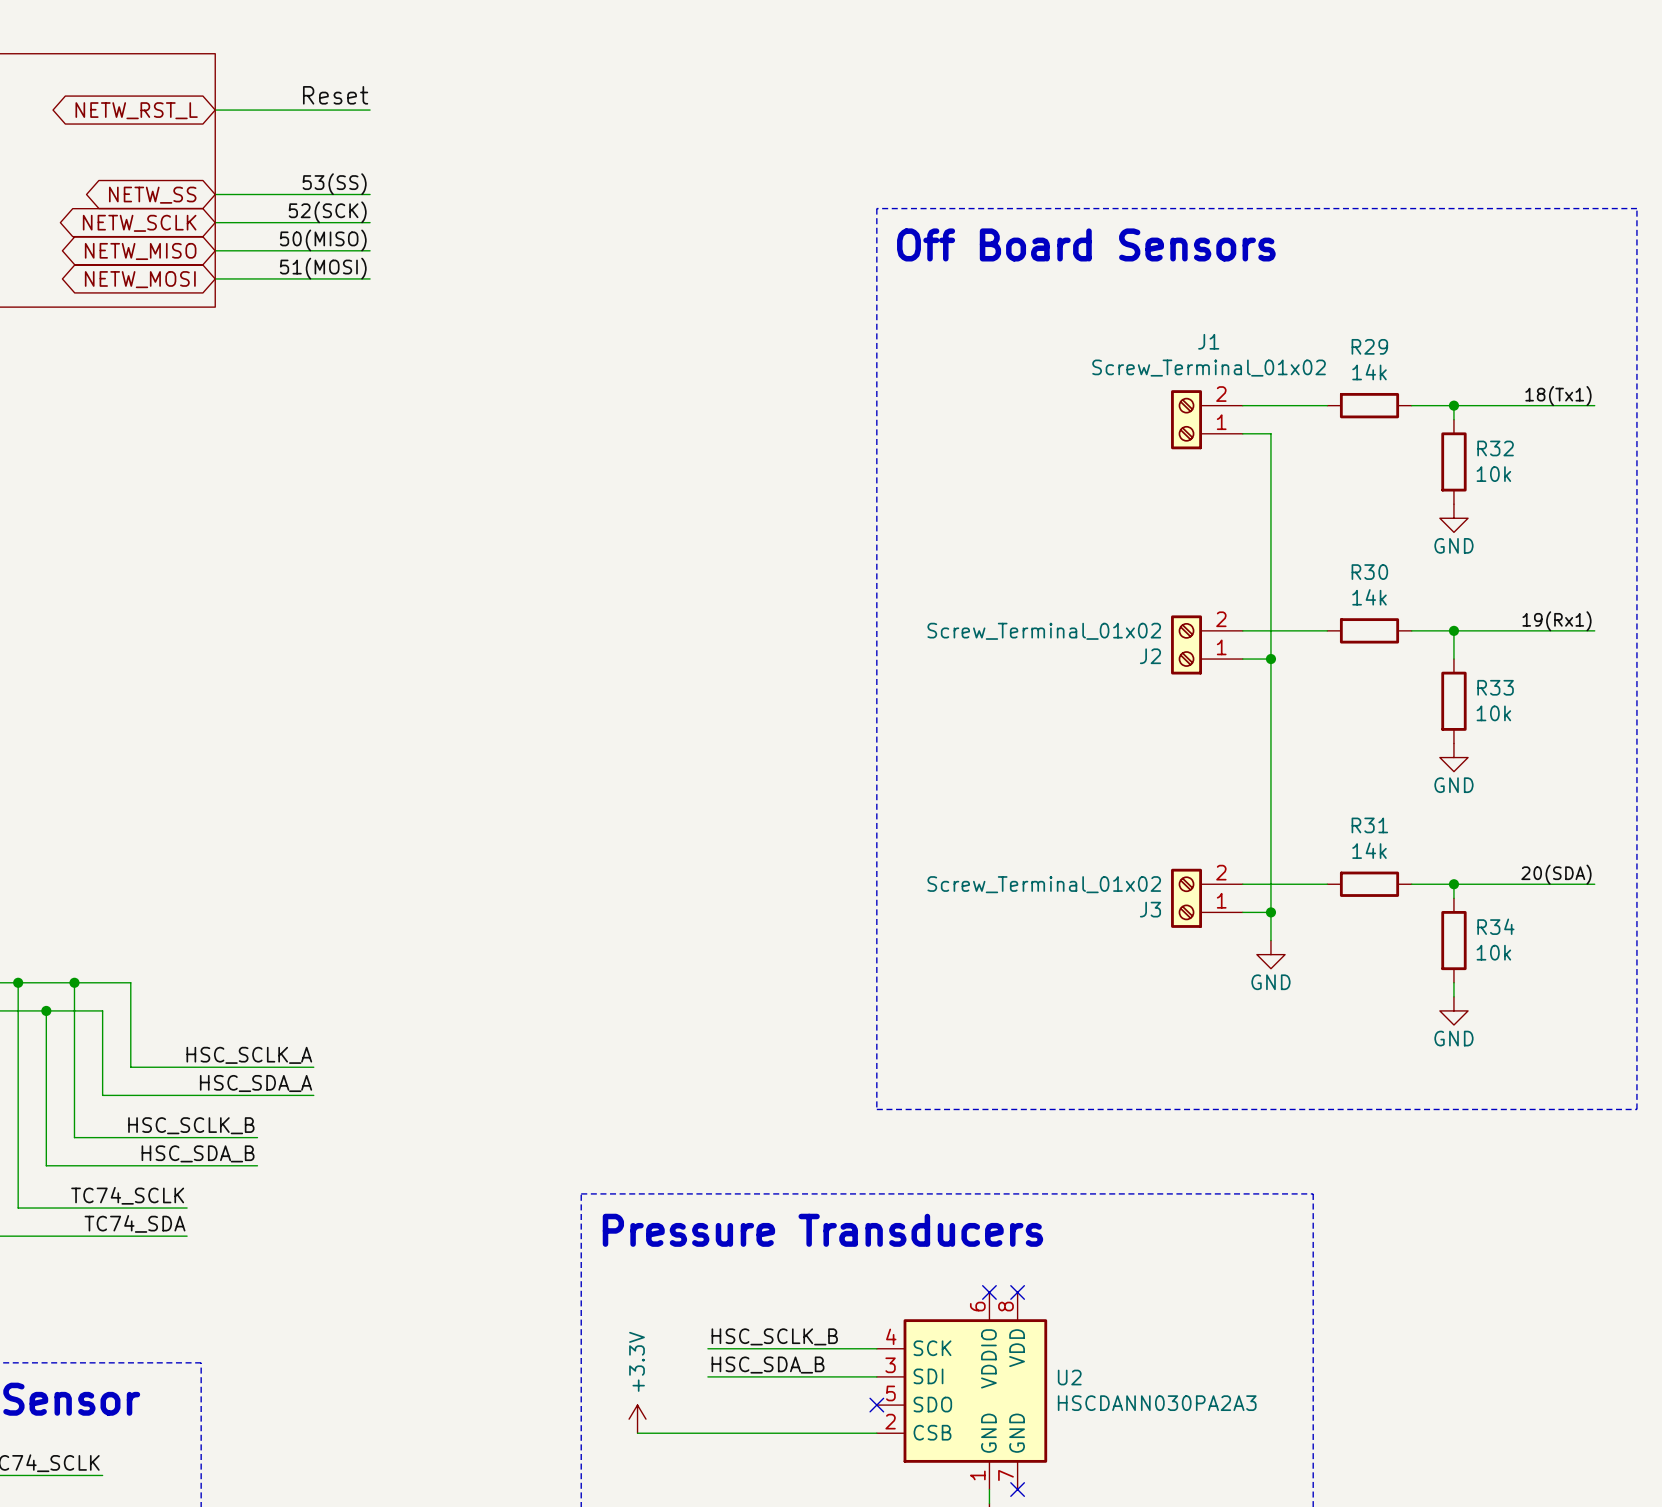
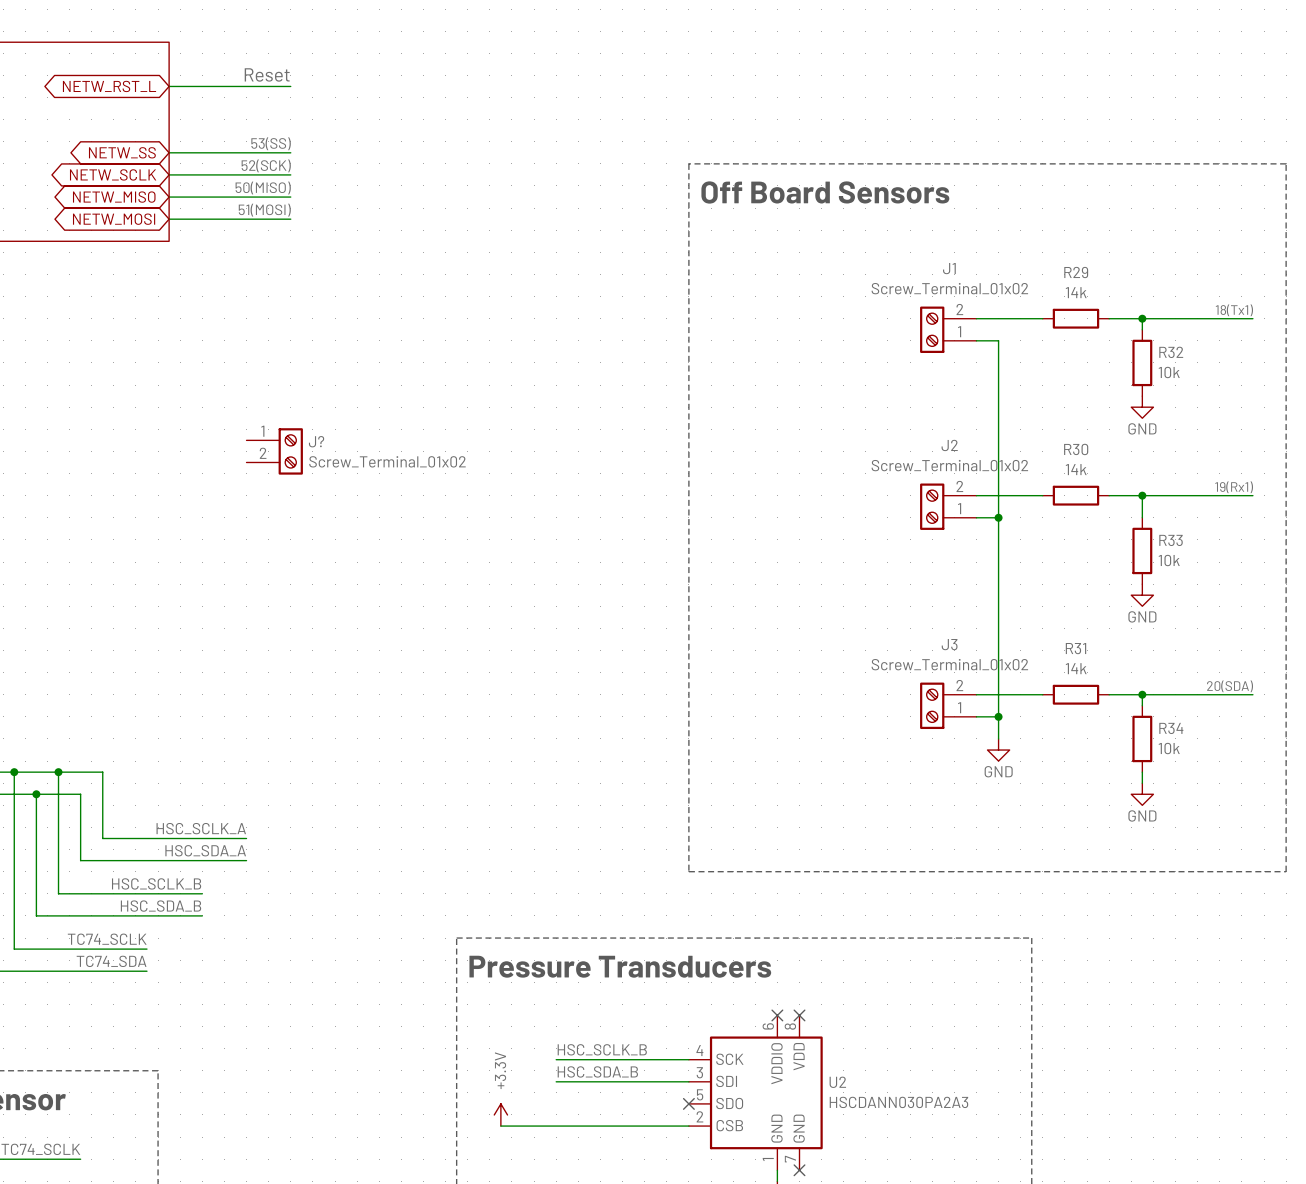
J?: none -> Screw_Terminal_01x02 (274, 451)
J2 value position: Screw_Terminal_01x02 (1044, 631) -> Screw_Terminal_01x02 (949, 465)
J2 name position: J2 (1150, 656) -> J2 (949, 445)
J3 value position: Screw_Terminal_01x02 (1044, 884) -> Screw_Terminal_01x02 (949, 664)
J3 name position: J3 (1150, 909) -> J3 (949, 644)

